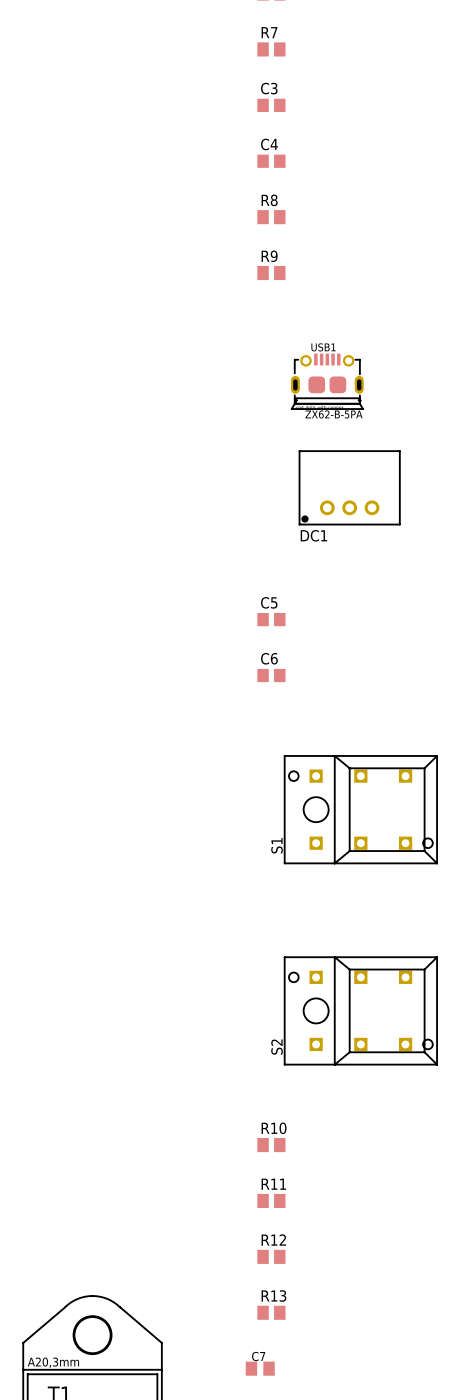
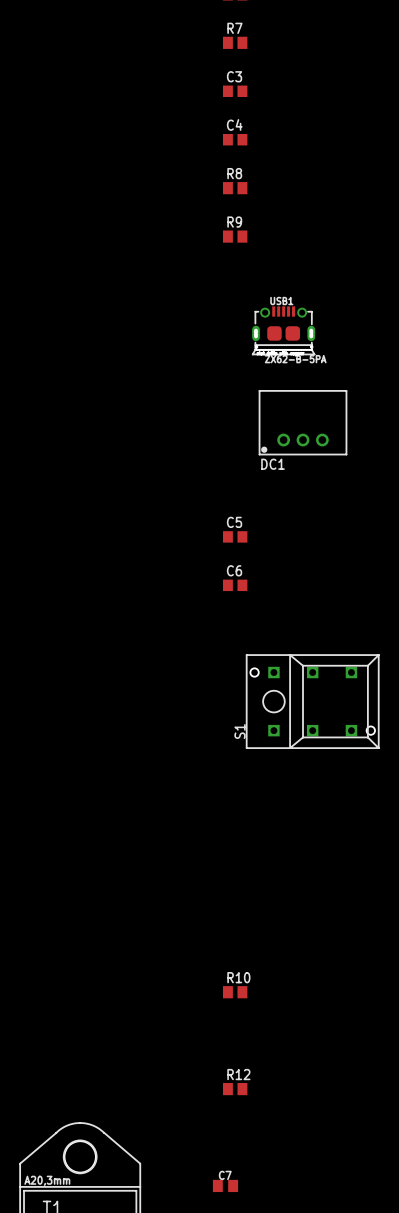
S2: (360, 1010) -> none
R11: (271, 1200) -> none
R13: (271, 1312) -> none

